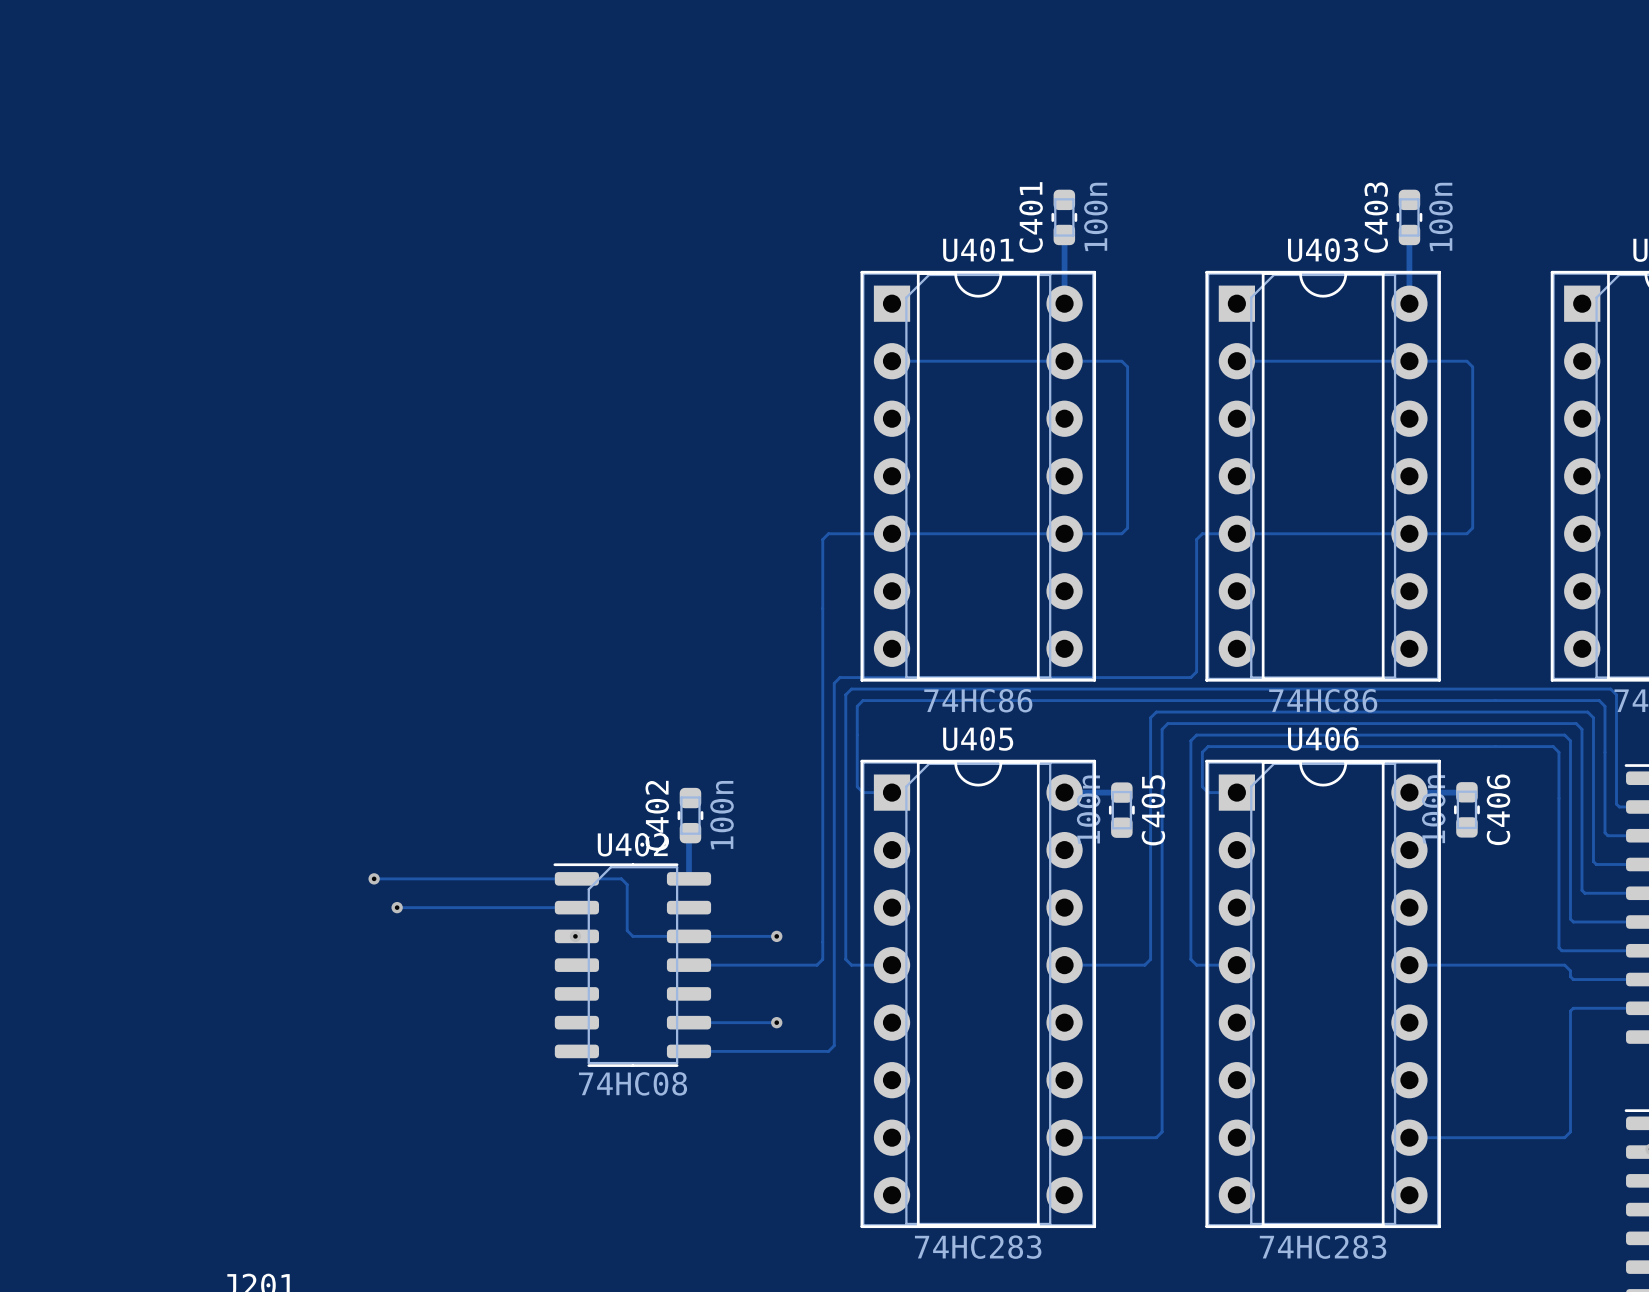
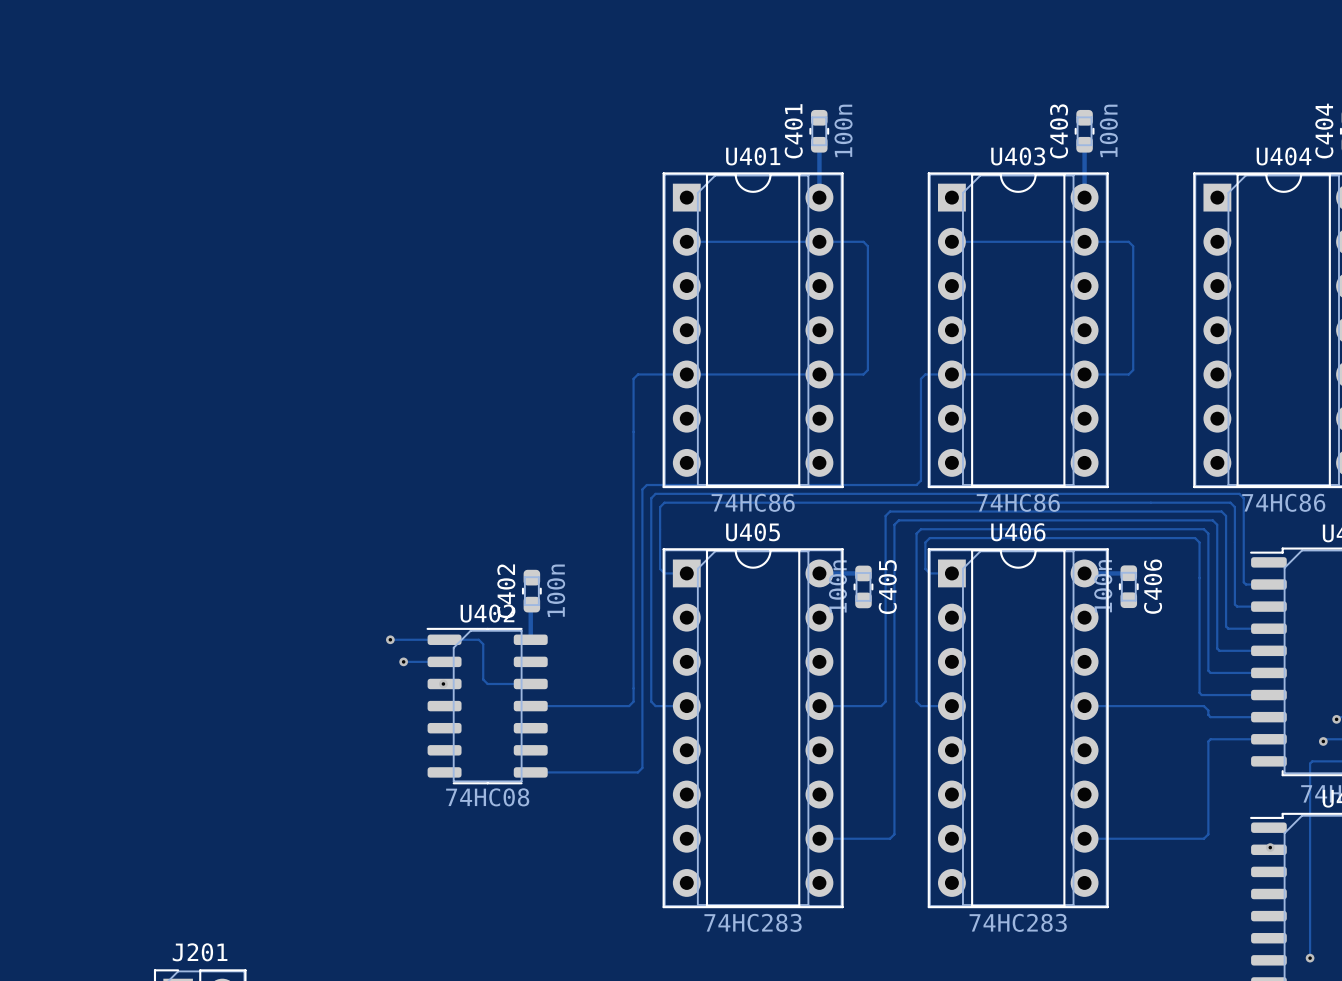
track: (374, 878) (506, 878) -> none
via: (374, 878) -> none
via: none -> (390, 639)
track: (397, 907) (523, 907) -> none
via: (397, 907) -> none
via: none -> (403, 661)
track: (689, 936) (776, 936) -> none
via: (776, 936) -> none
track: (689, 1022) (776, 1022) -> none
via: (776, 1022) -> none

